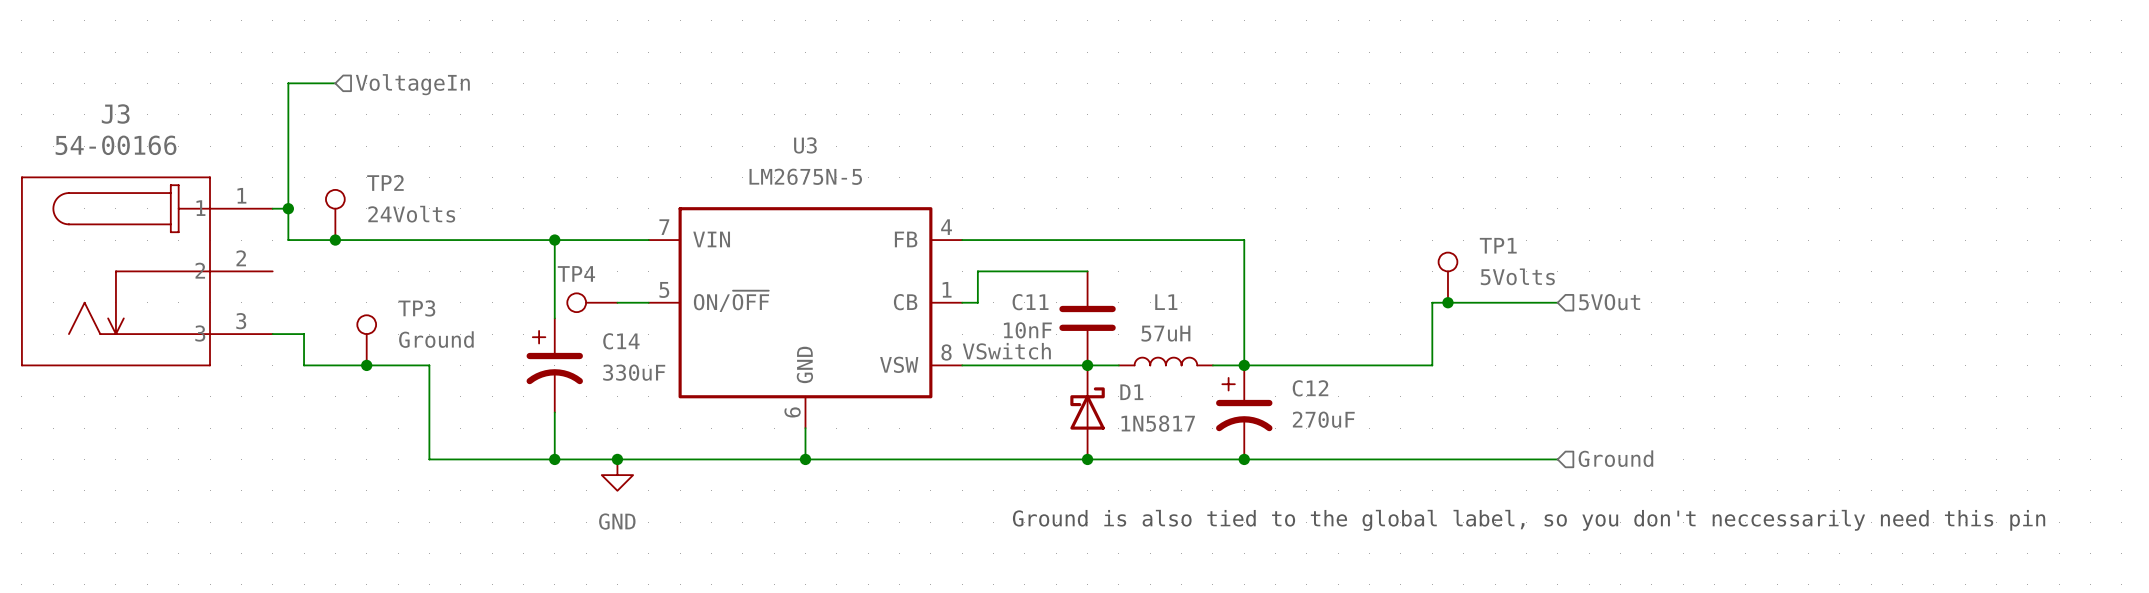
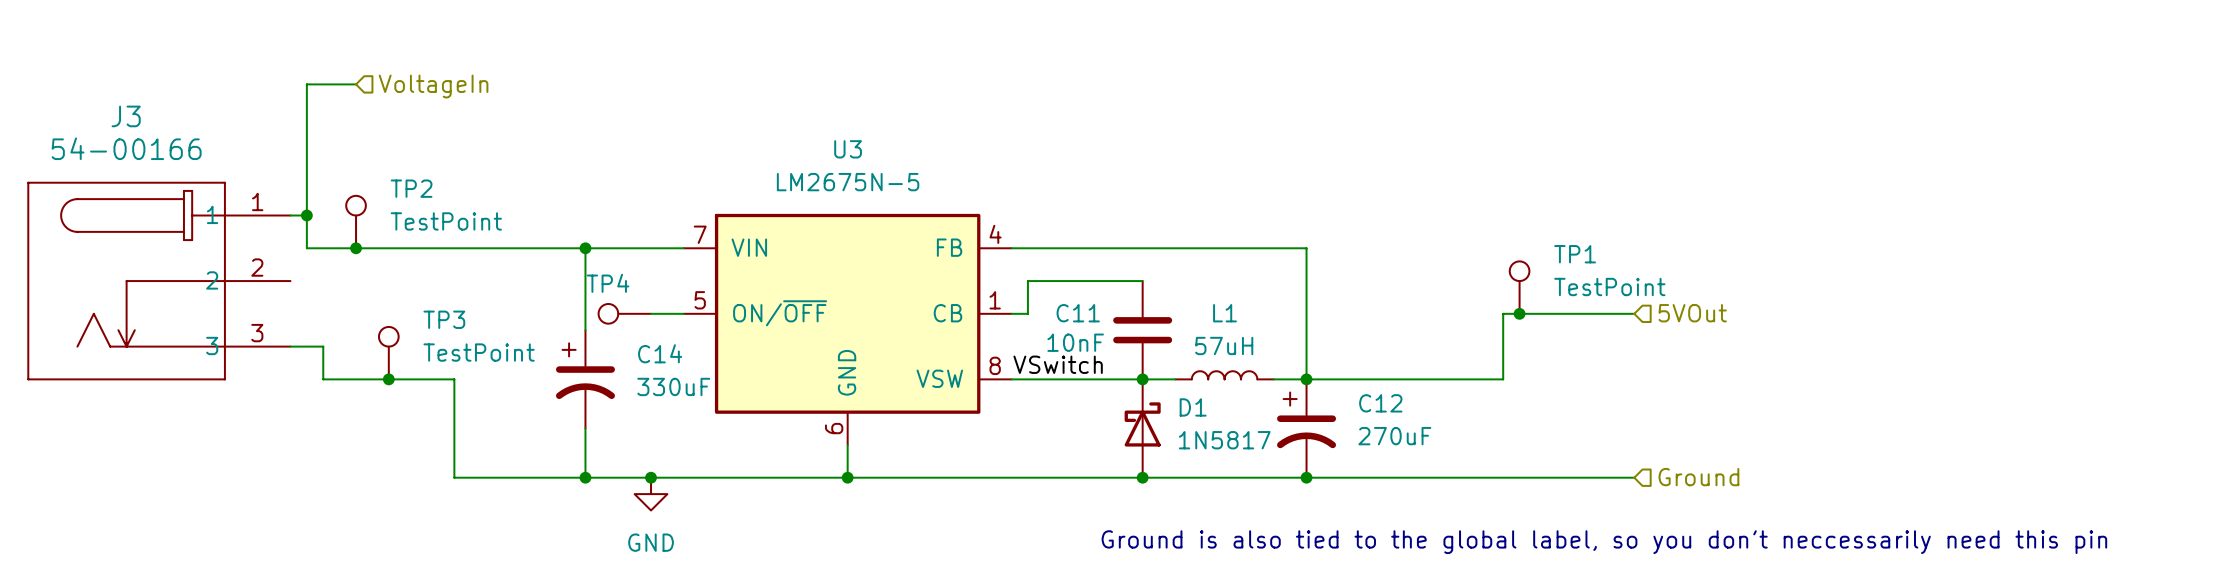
TP2 value: 24Volts (411, 214) -> TestPoint (446, 221)
TP1 value: 5Volts (1517, 276) -> TestPoint (1609, 286)
TP3 value: Ground (436, 339) -> TestPoint (479, 352)

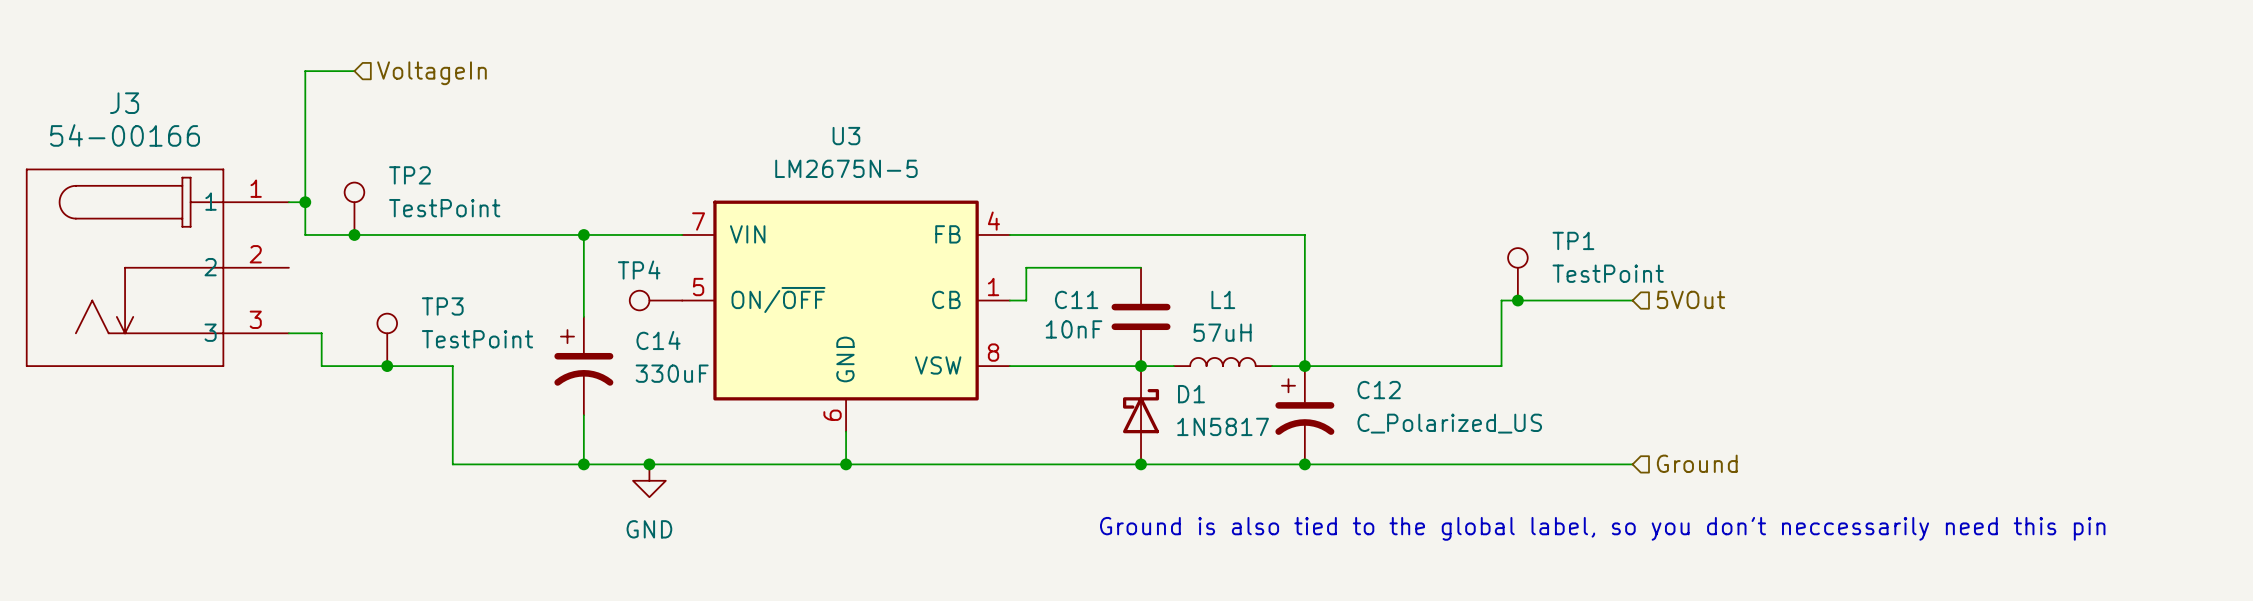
TP4 position: (624, 313) -> (655, 300)
label: VSwitch (1058, 364) -> none
C12 value: 270uF (1394, 436) -> C_Polarized_US (1449, 423)

